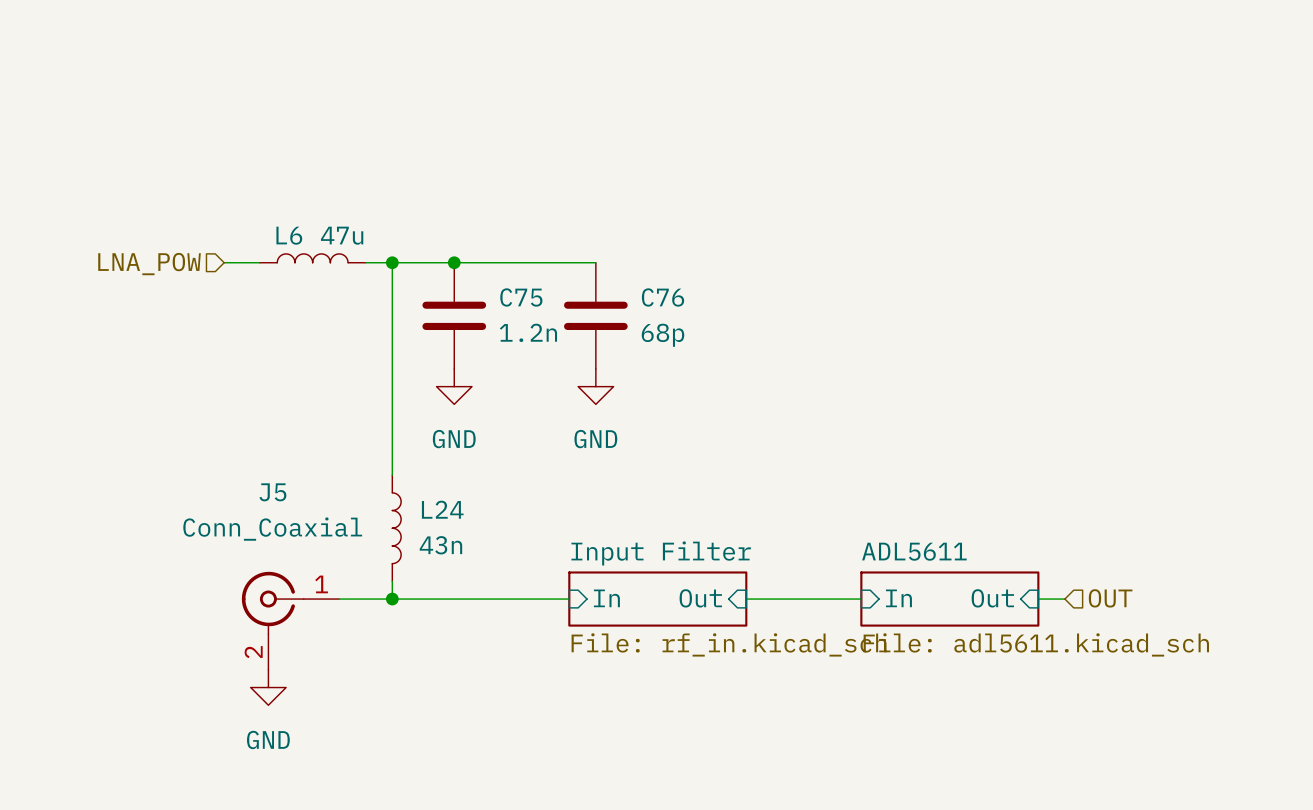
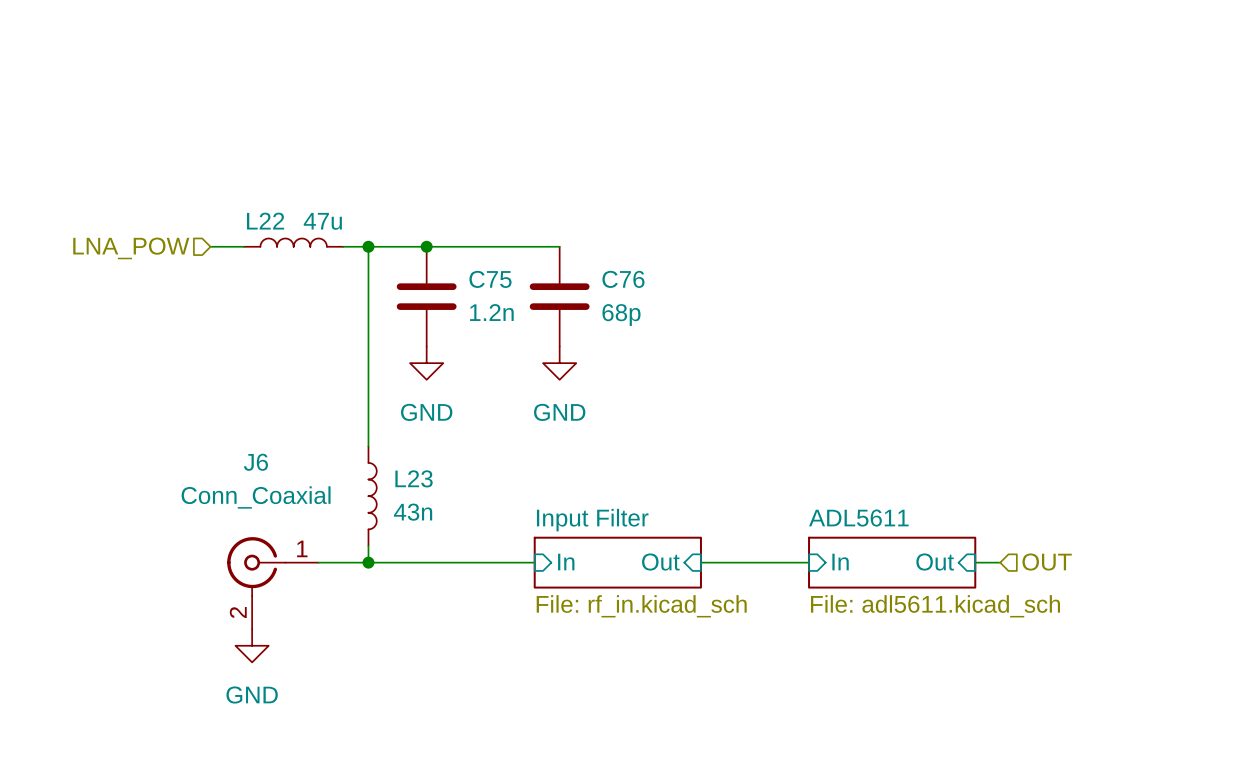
L6 name: L6 (289, 235) -> L22 (265, 221)
J5 name: J5 (272, 492) -> J6 (255, 462)
L24 name: L24 (442, 509) -> L23 (414, 478)

